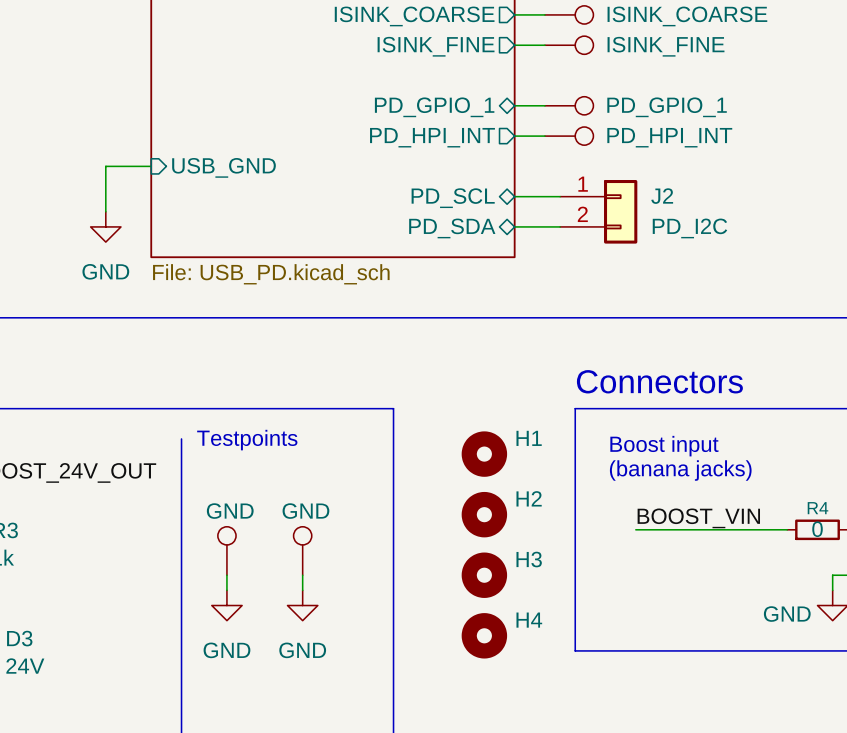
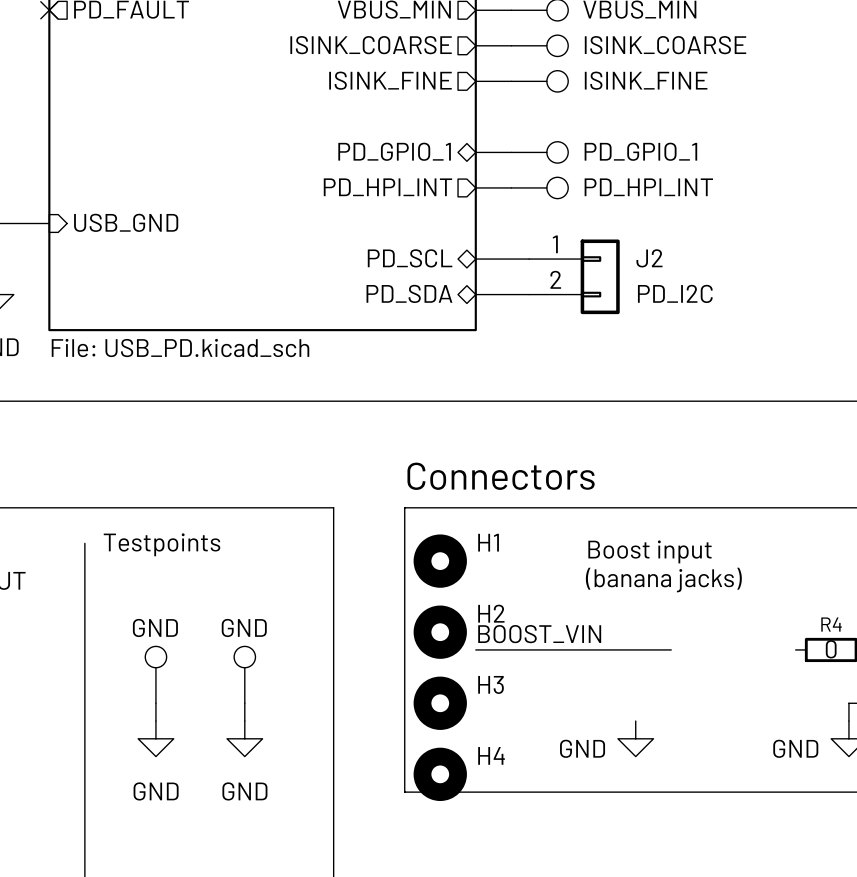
text position: Connectors (659, 381) -> Connectors (501, 476)
line: (575, 408) (575, 650) -> (546, 507) (404, 507) (404, 792) (546, 792)
label position: BOOST_VIN (698, 518) -> BOOST_VIN (539, 634)
wire: none -> (475, 649) (617, 649)
wire: (681, 529) (787, 529) -> none
part position: (226, 551) -> (155, 674)
part position: (302, 551) -> (244, 674)
wire: (226, 575) (226, 590) -> (155, 703) (155, 721)
wire: (302, 575) (302, 590) -> (244, 703) (244, 721)
power symbol position: GND (226, 605) -> GND (155, 738)
power symbol position: GND (302, 605) -> GND (244, 738)
power symbol: none -> GND (635, 738)

